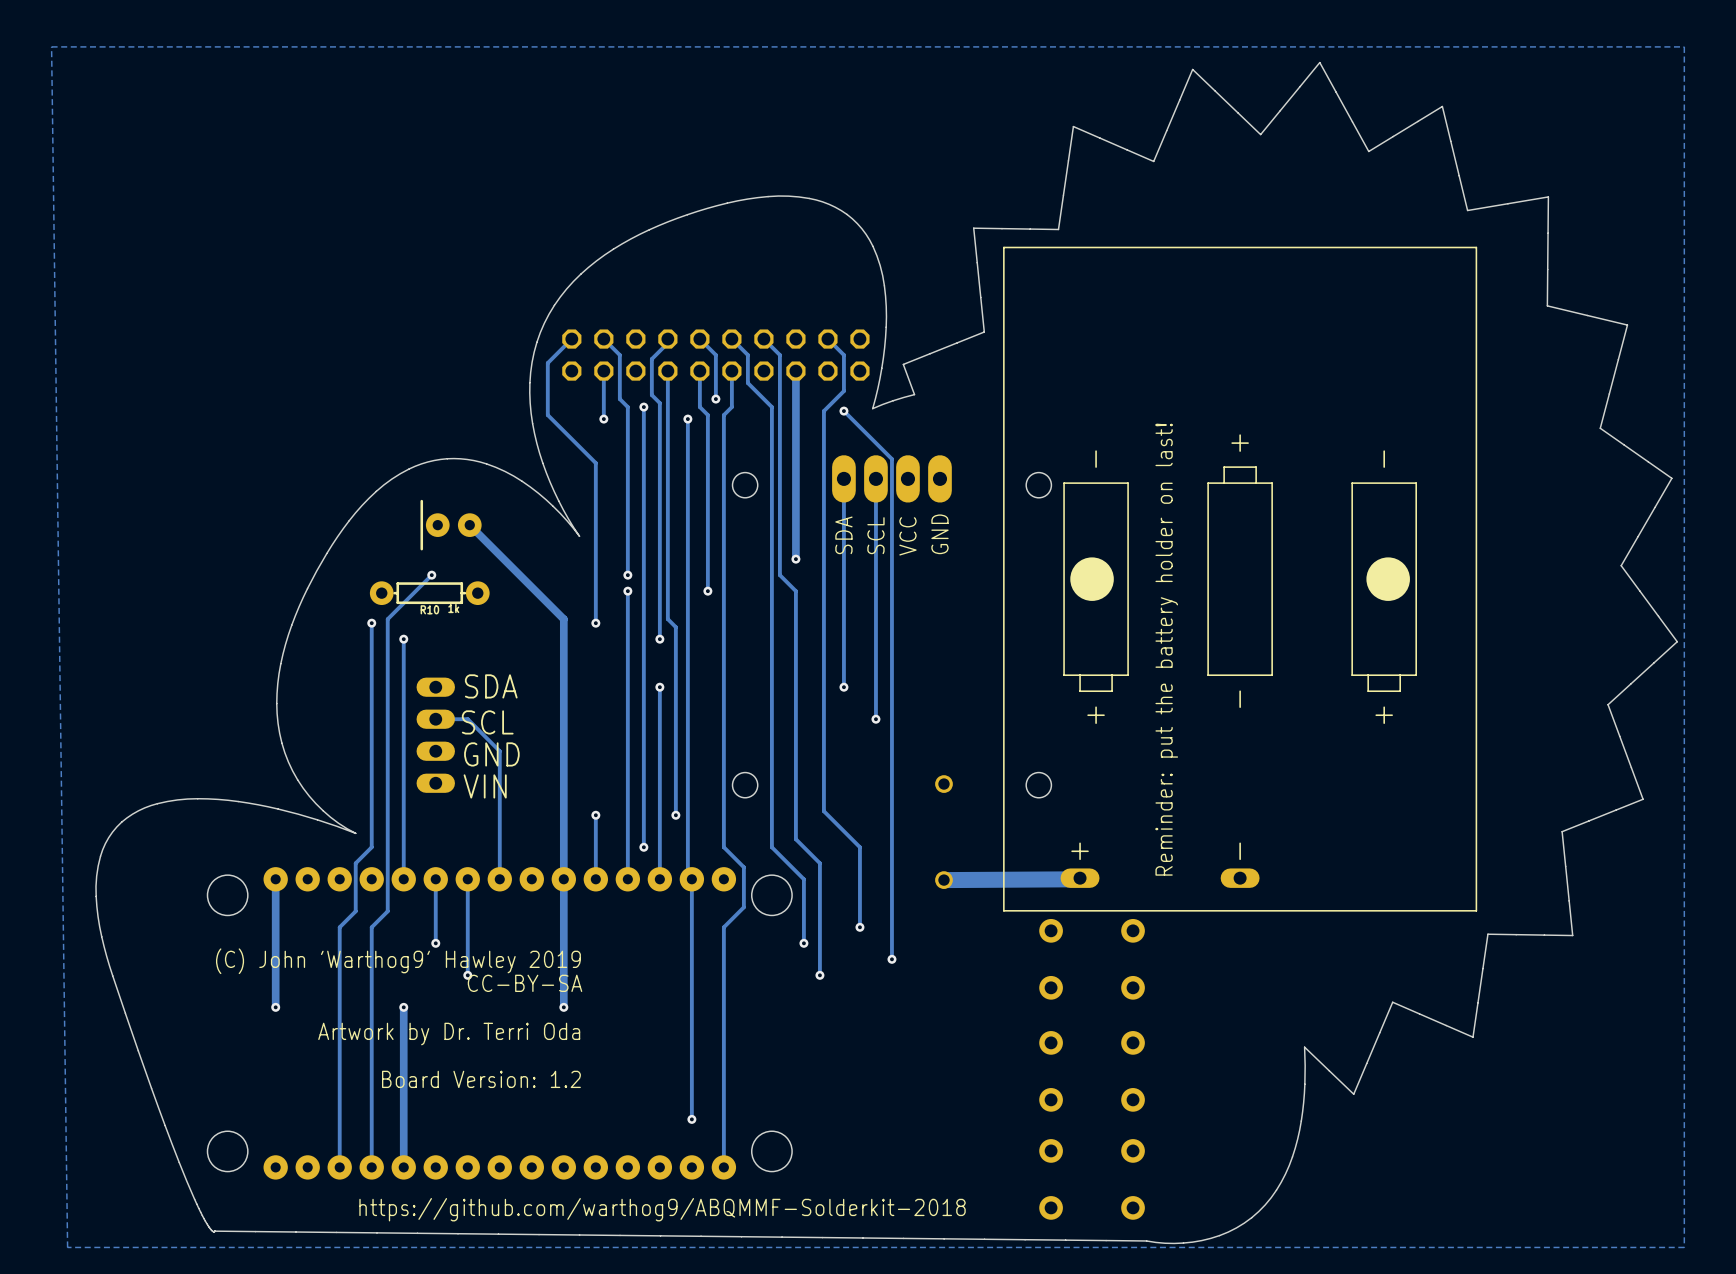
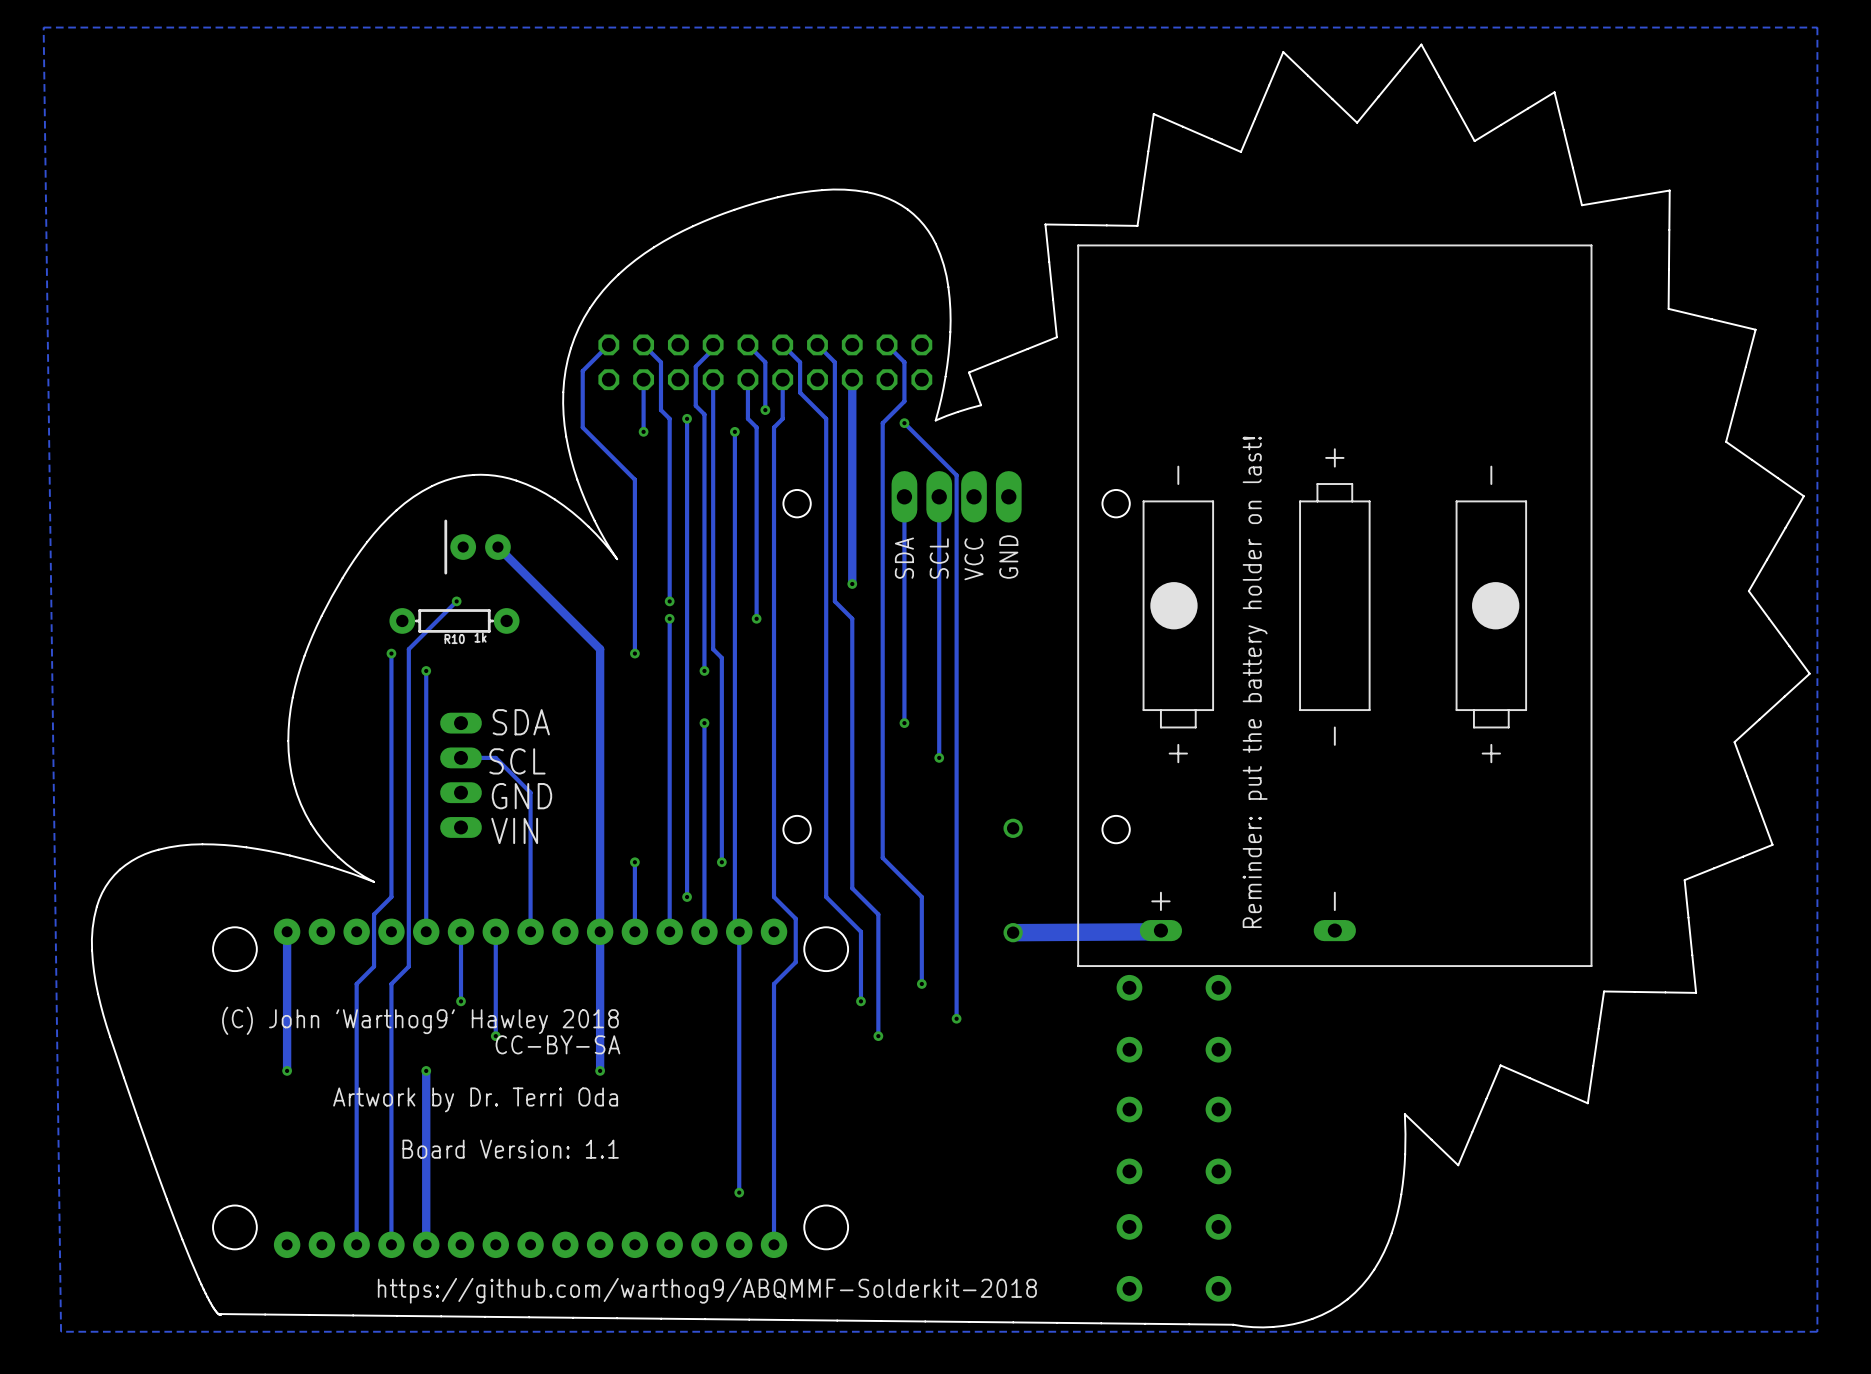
text: (C) John 'Warthog9' Hawley 2019 (398, 961) -> (C) John 'Warthog9' Hawley 2018 (420, 1020)
text: Board Version: 1.2 (481, 1079) -> Board Version: 1.1 (510, 1149)

